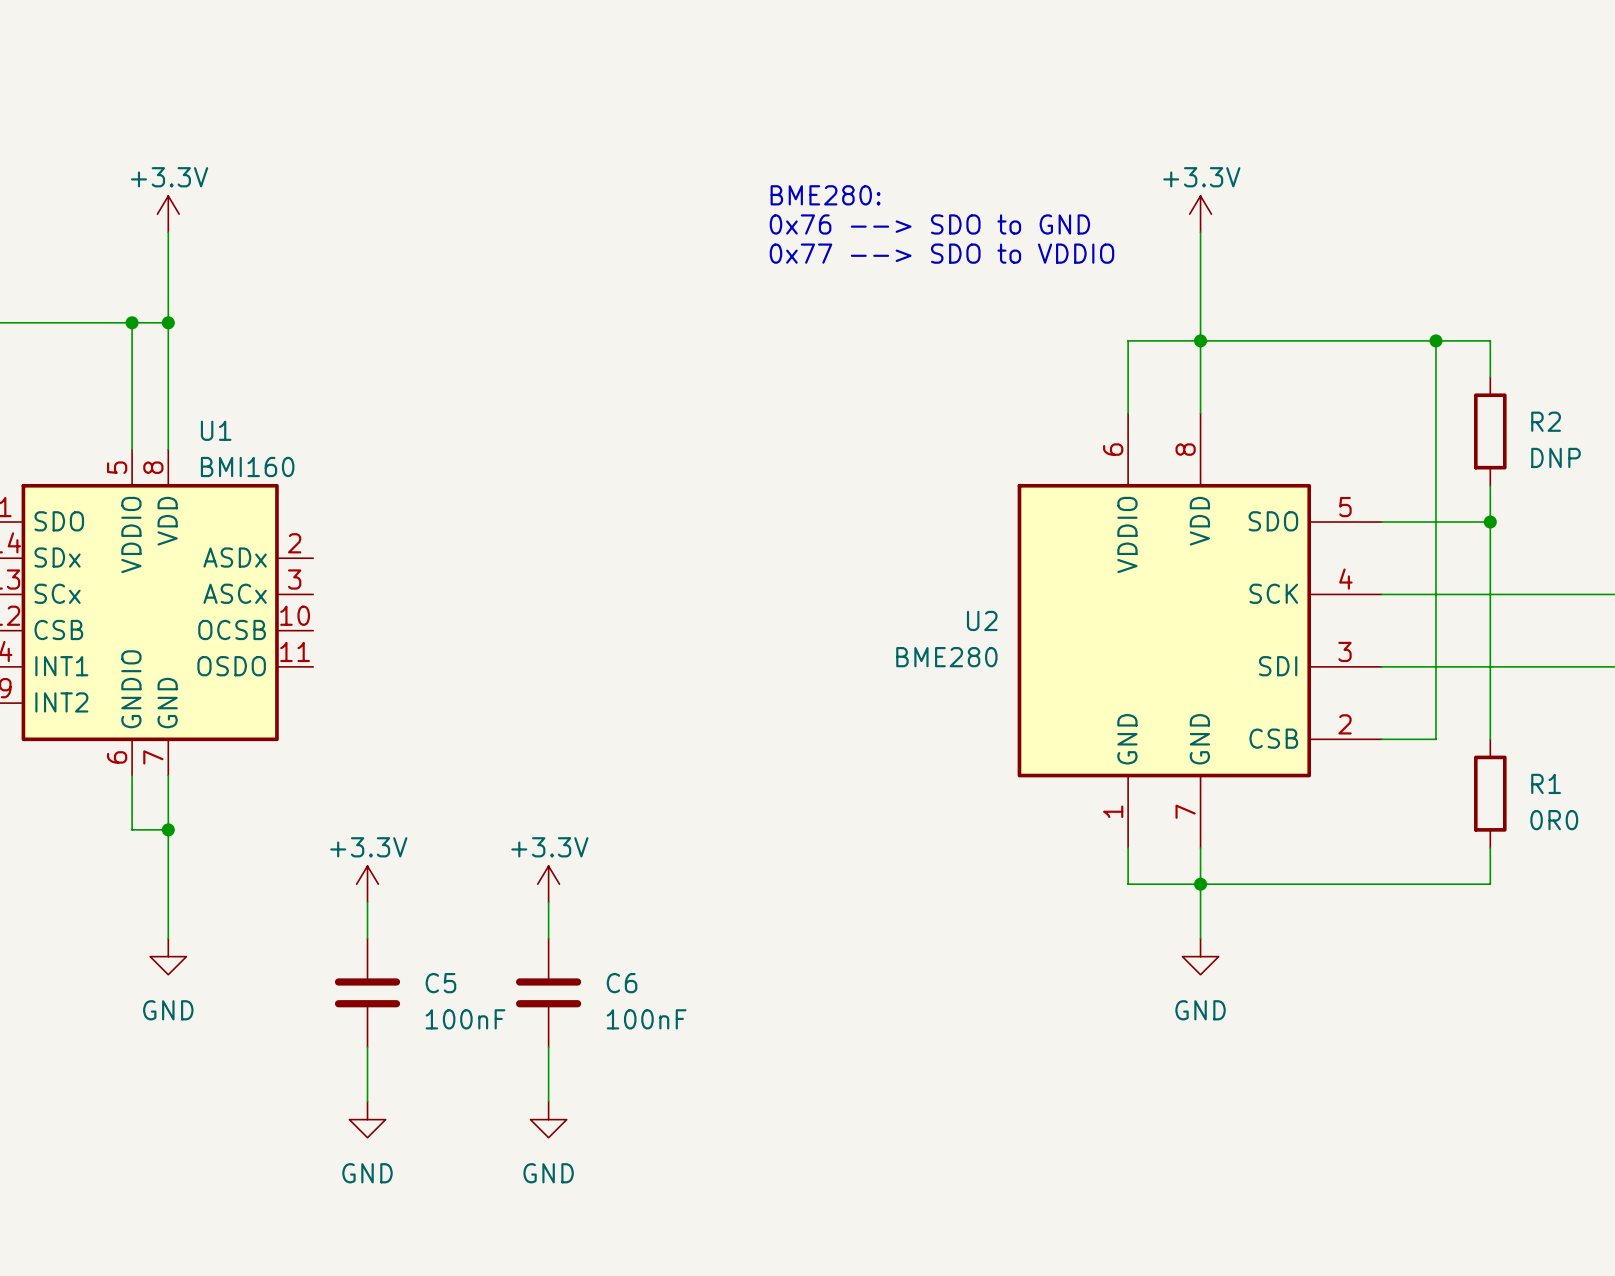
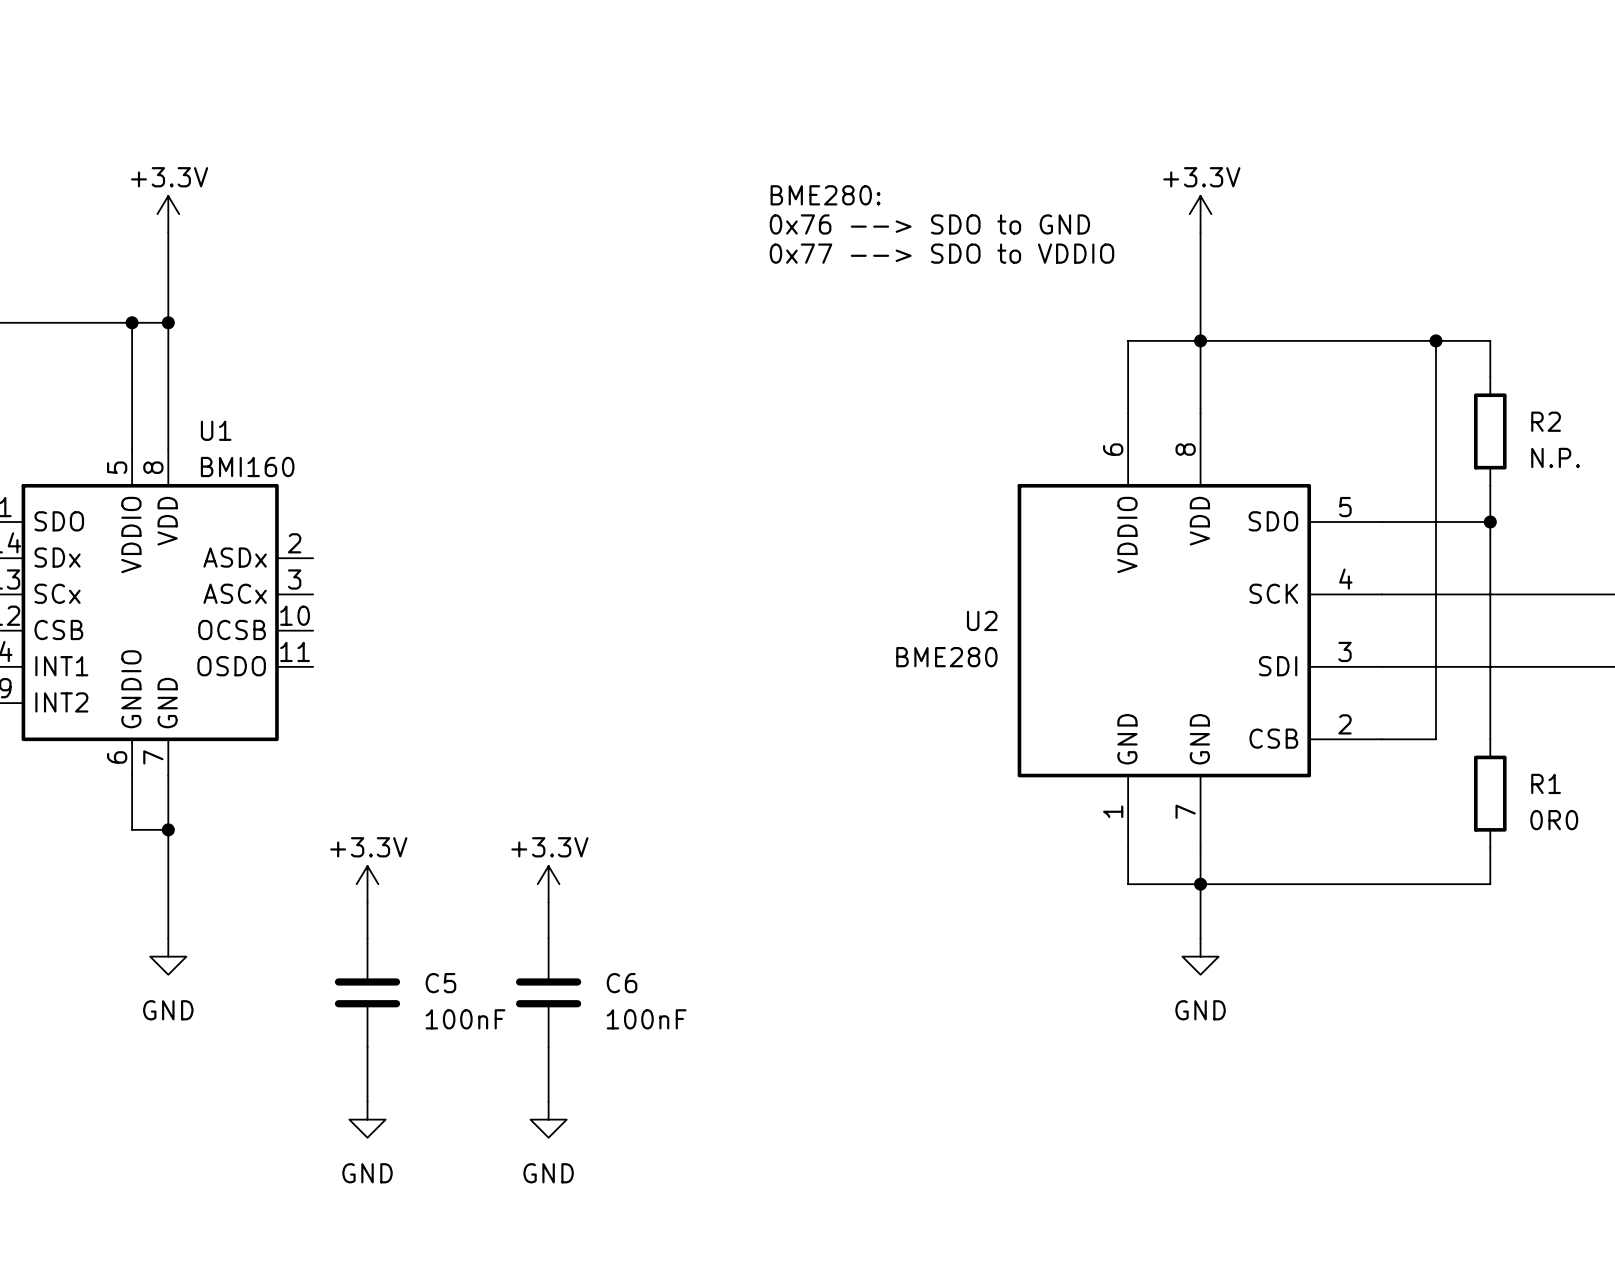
R2 value: DNP (1555, 457) -> N.P. (1555, 457)

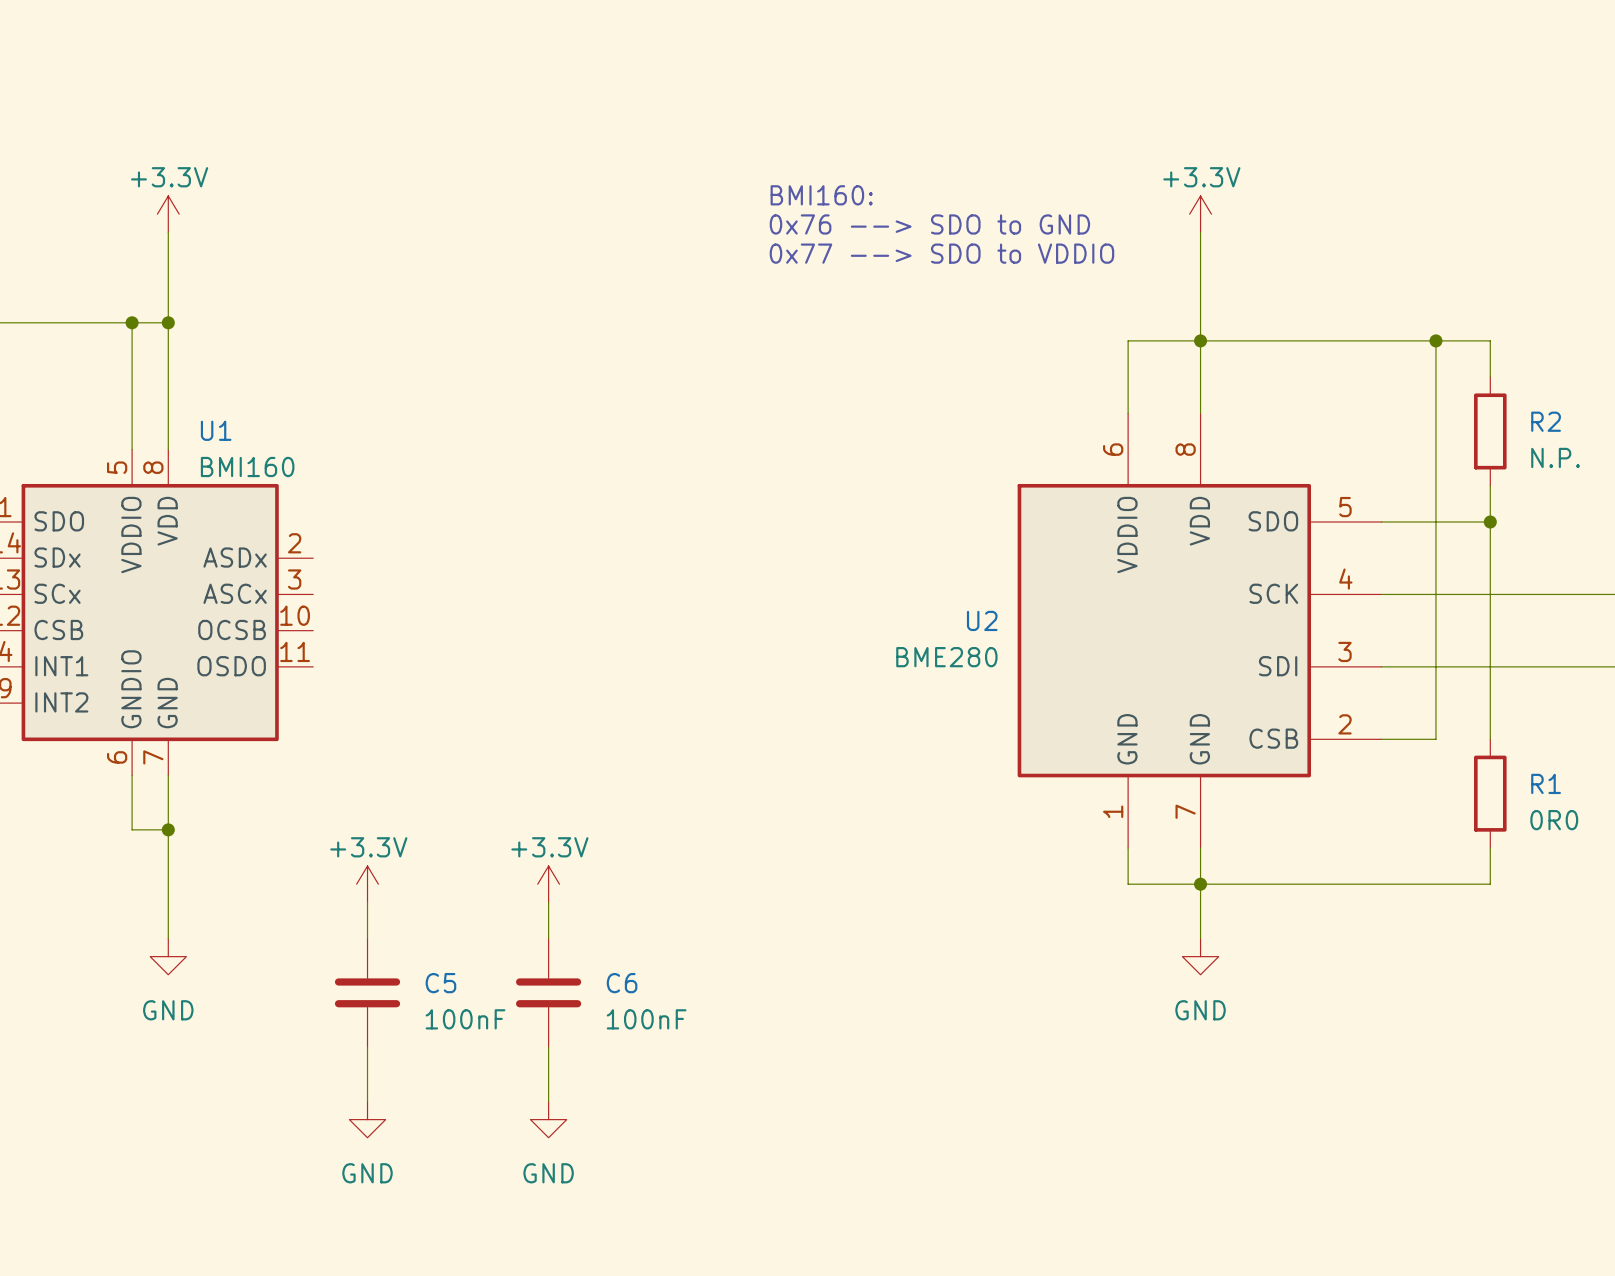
text: BME280: (825, 195) -> BMI160: (821, 195)

